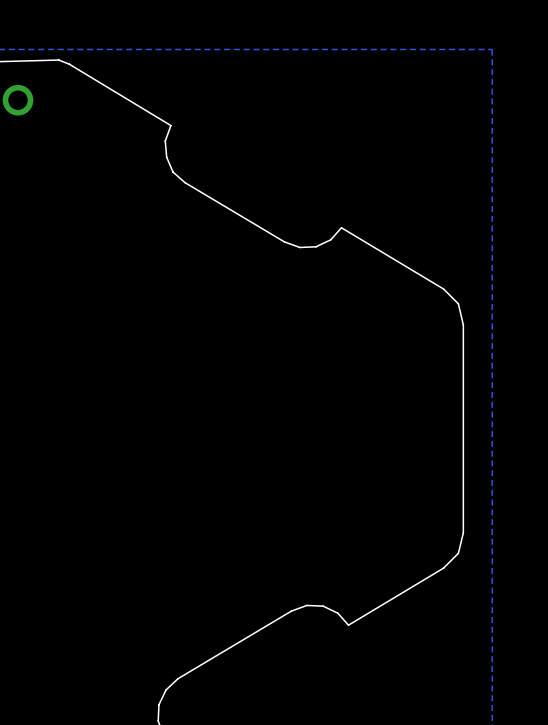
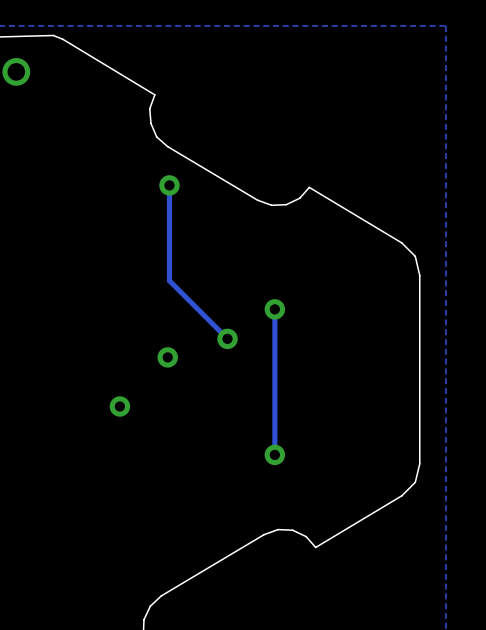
track: none -> (169, 185) (169, 280) (227, 338)
via: none -> (169, 185)
track: none -> (274, 309) (274, 454)
via: none -> (274, 309)
via: none -> (227, 338)
via: none -> (167, 357)
via: none -> (119, 406)
via: none -> (274, 454)

